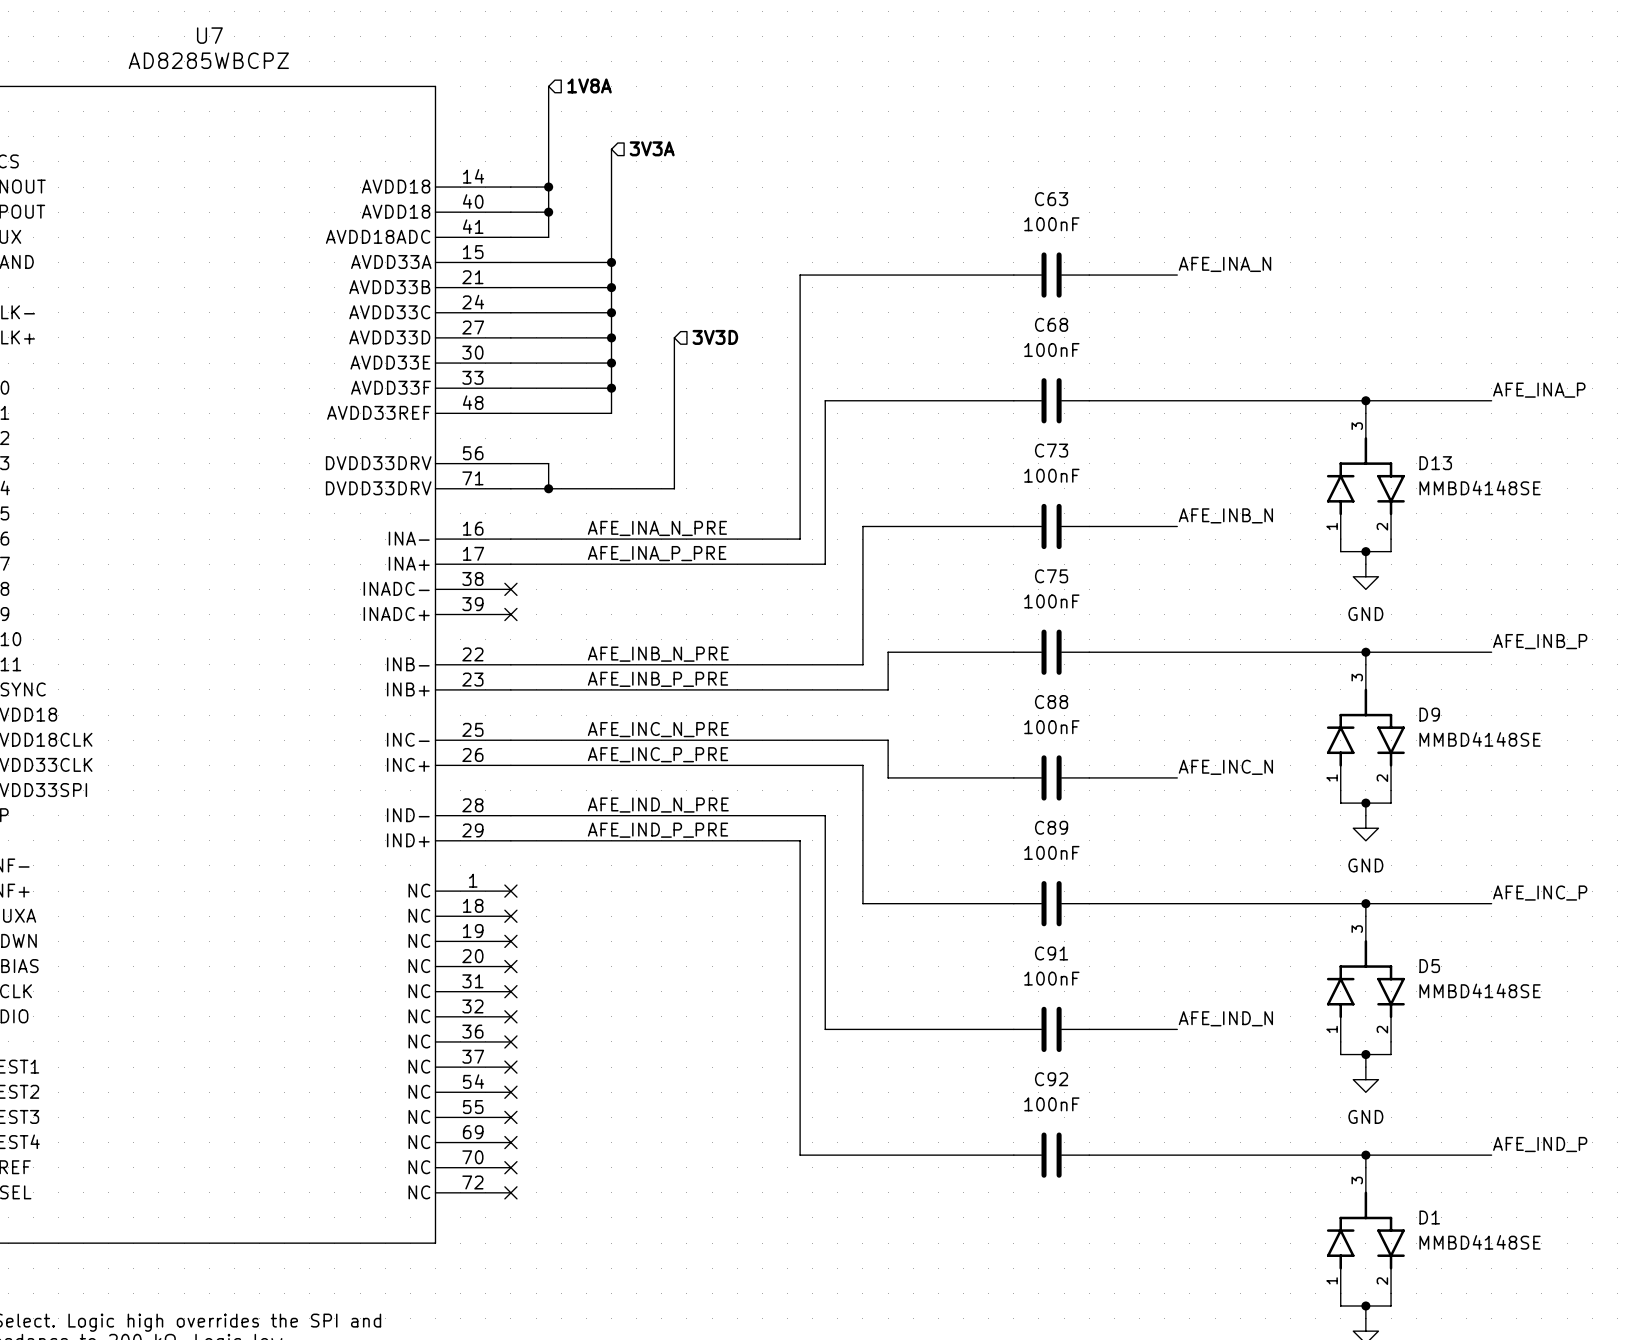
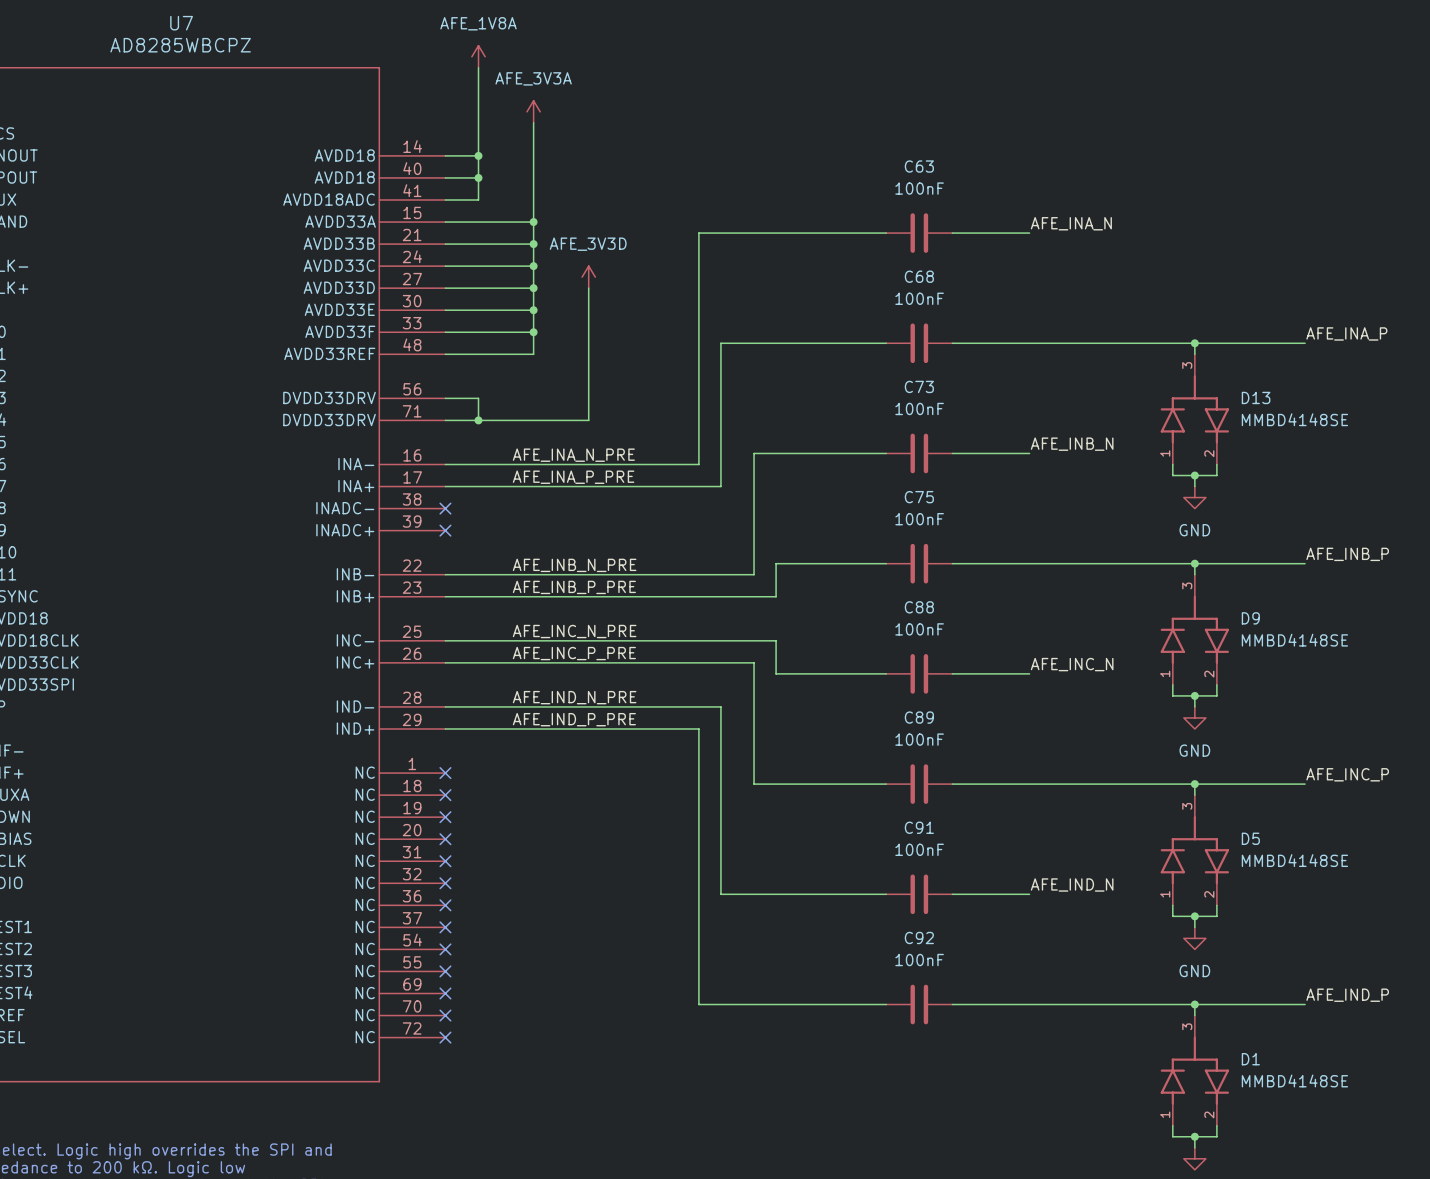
power symbol: none -> AFE_1V8A (478, 56)
hierarchical label: 1V8A (589, 85) -> none
power symbol: none -> AFE_3V3A (533, 111)
hierarchical label: 3V3A (652, 148) -> none
power symbol: none -> AFE_3V3D (588, 277)
hierarchical label: 3V3D (715, 337) -> none

